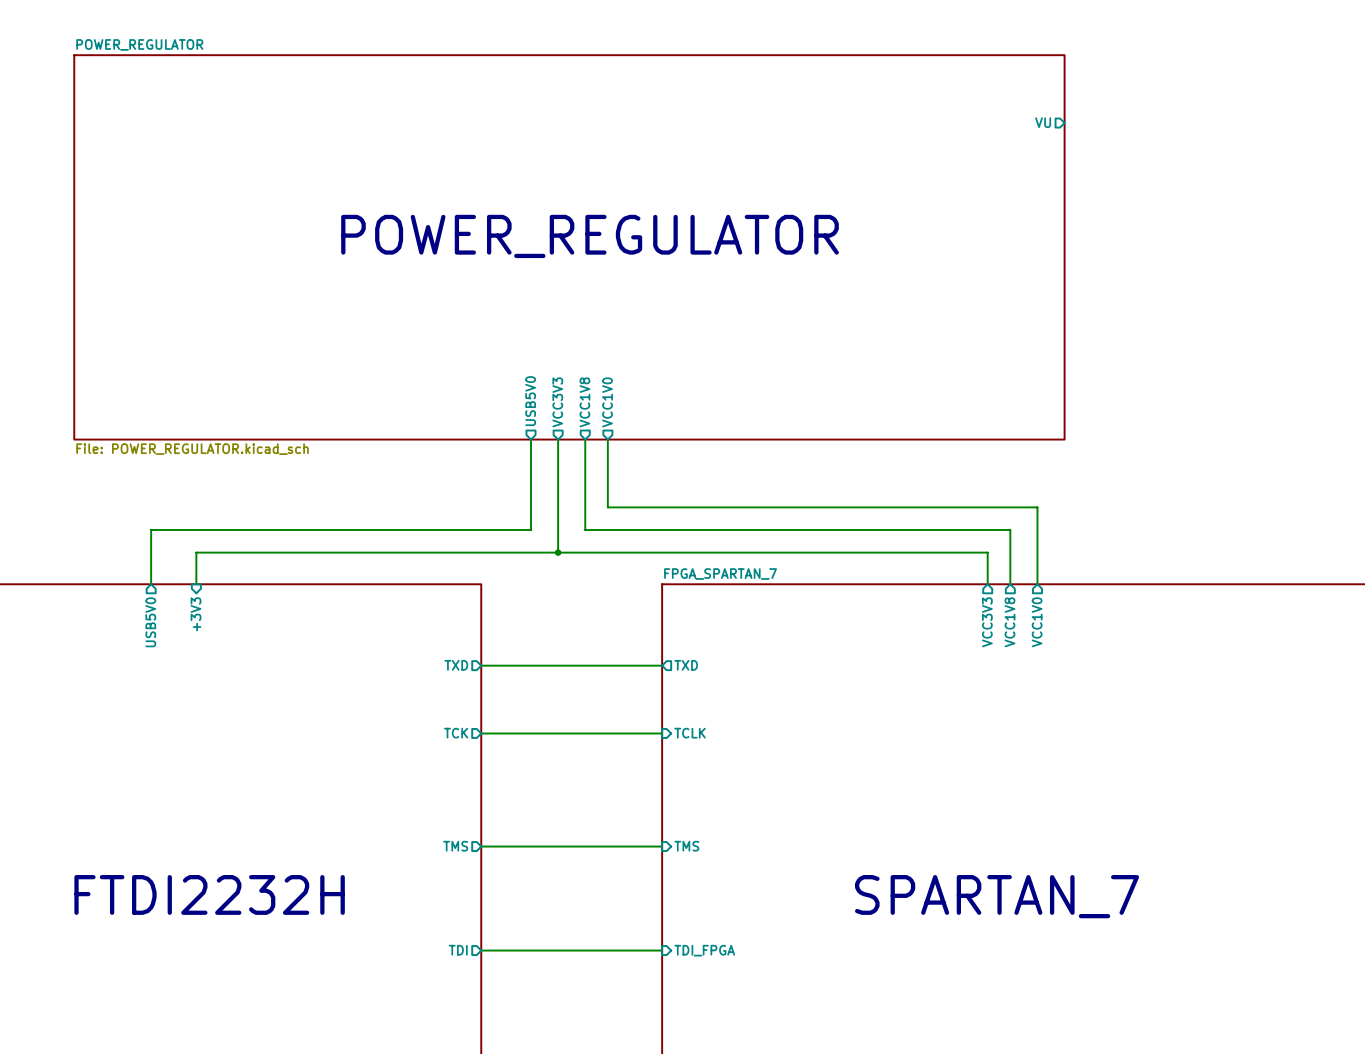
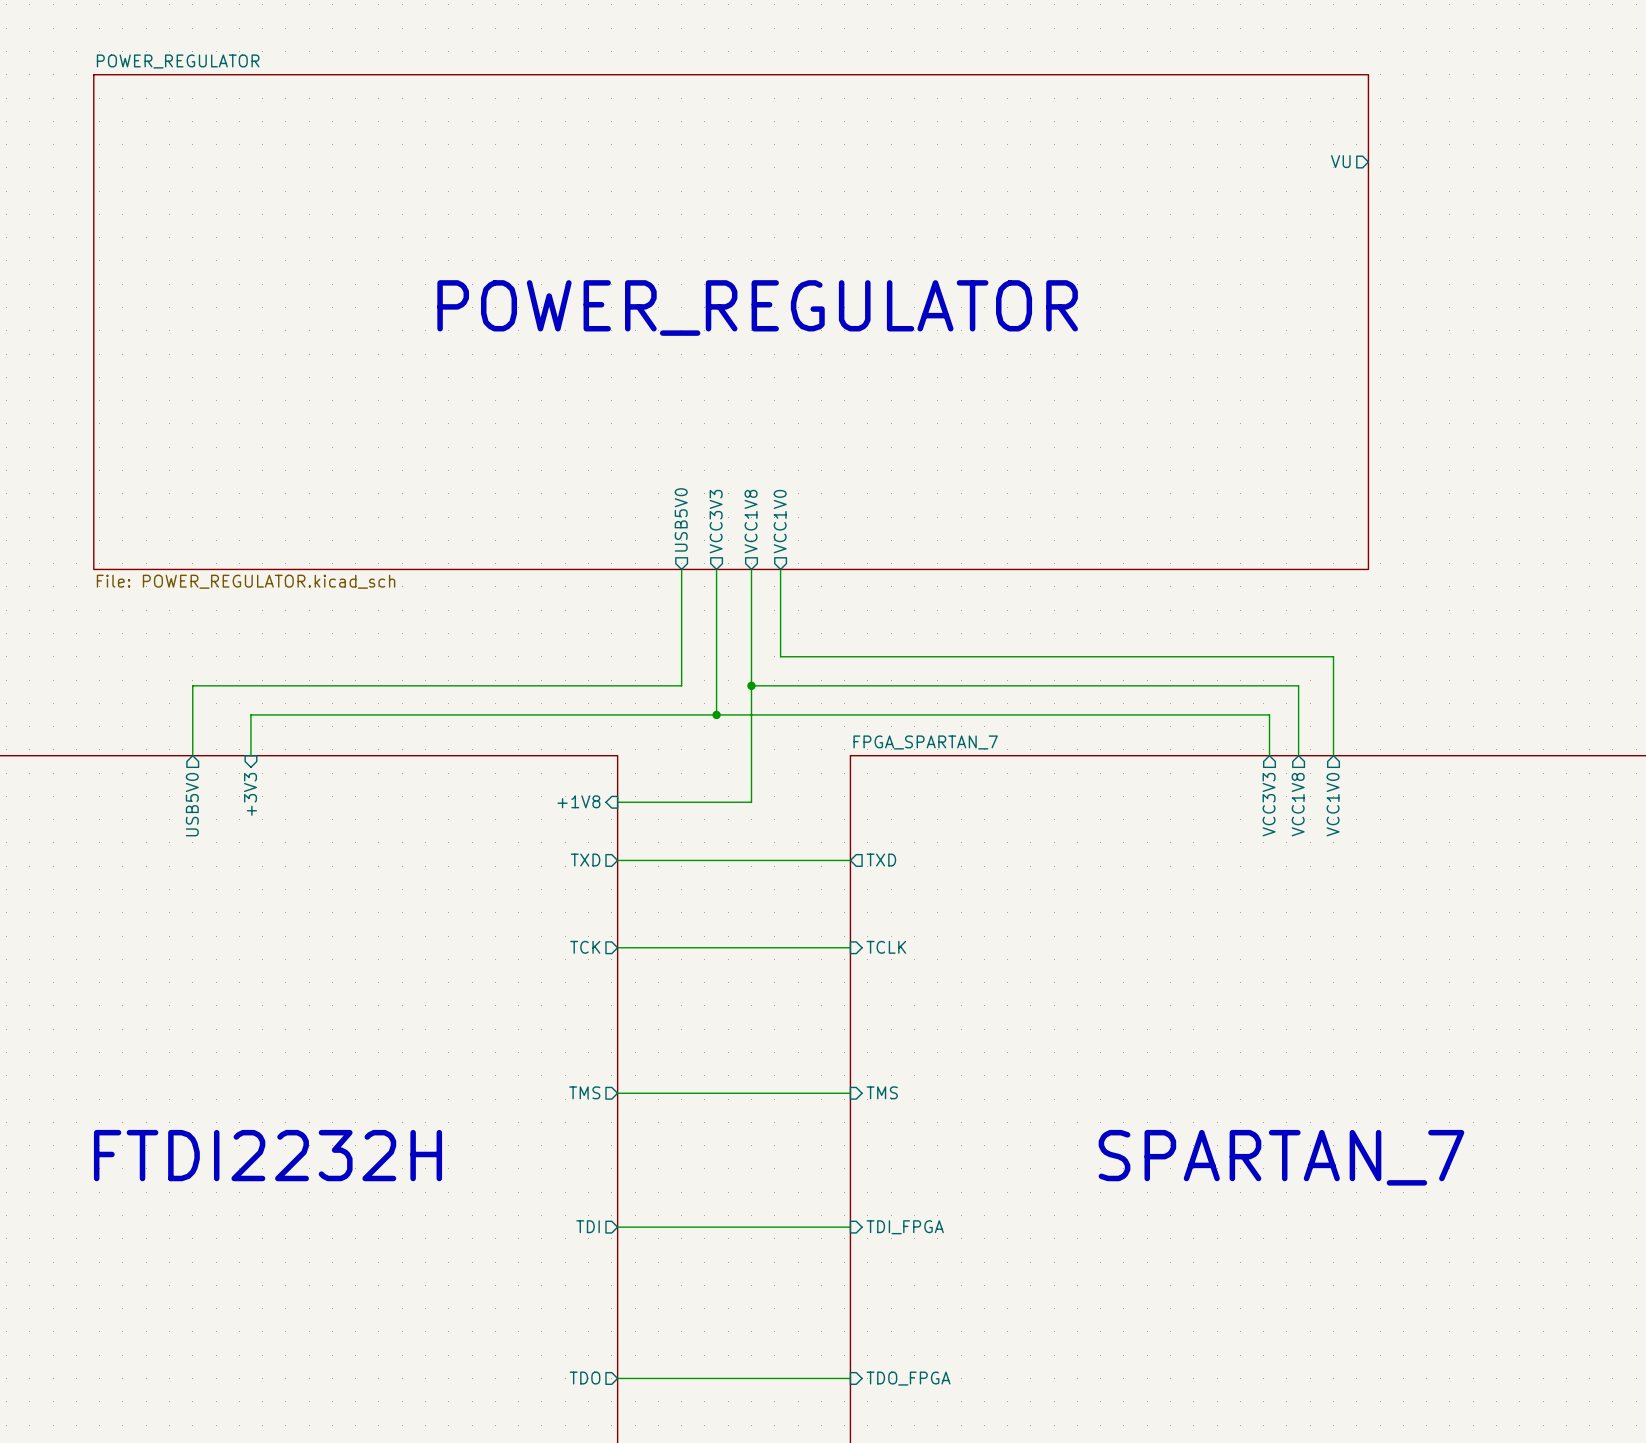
wire: none -> (751, 685) (751, 802) (617, 802)
junction: none -> (751, 685)
sheet pin: none -> +1V8 (578, 801)

